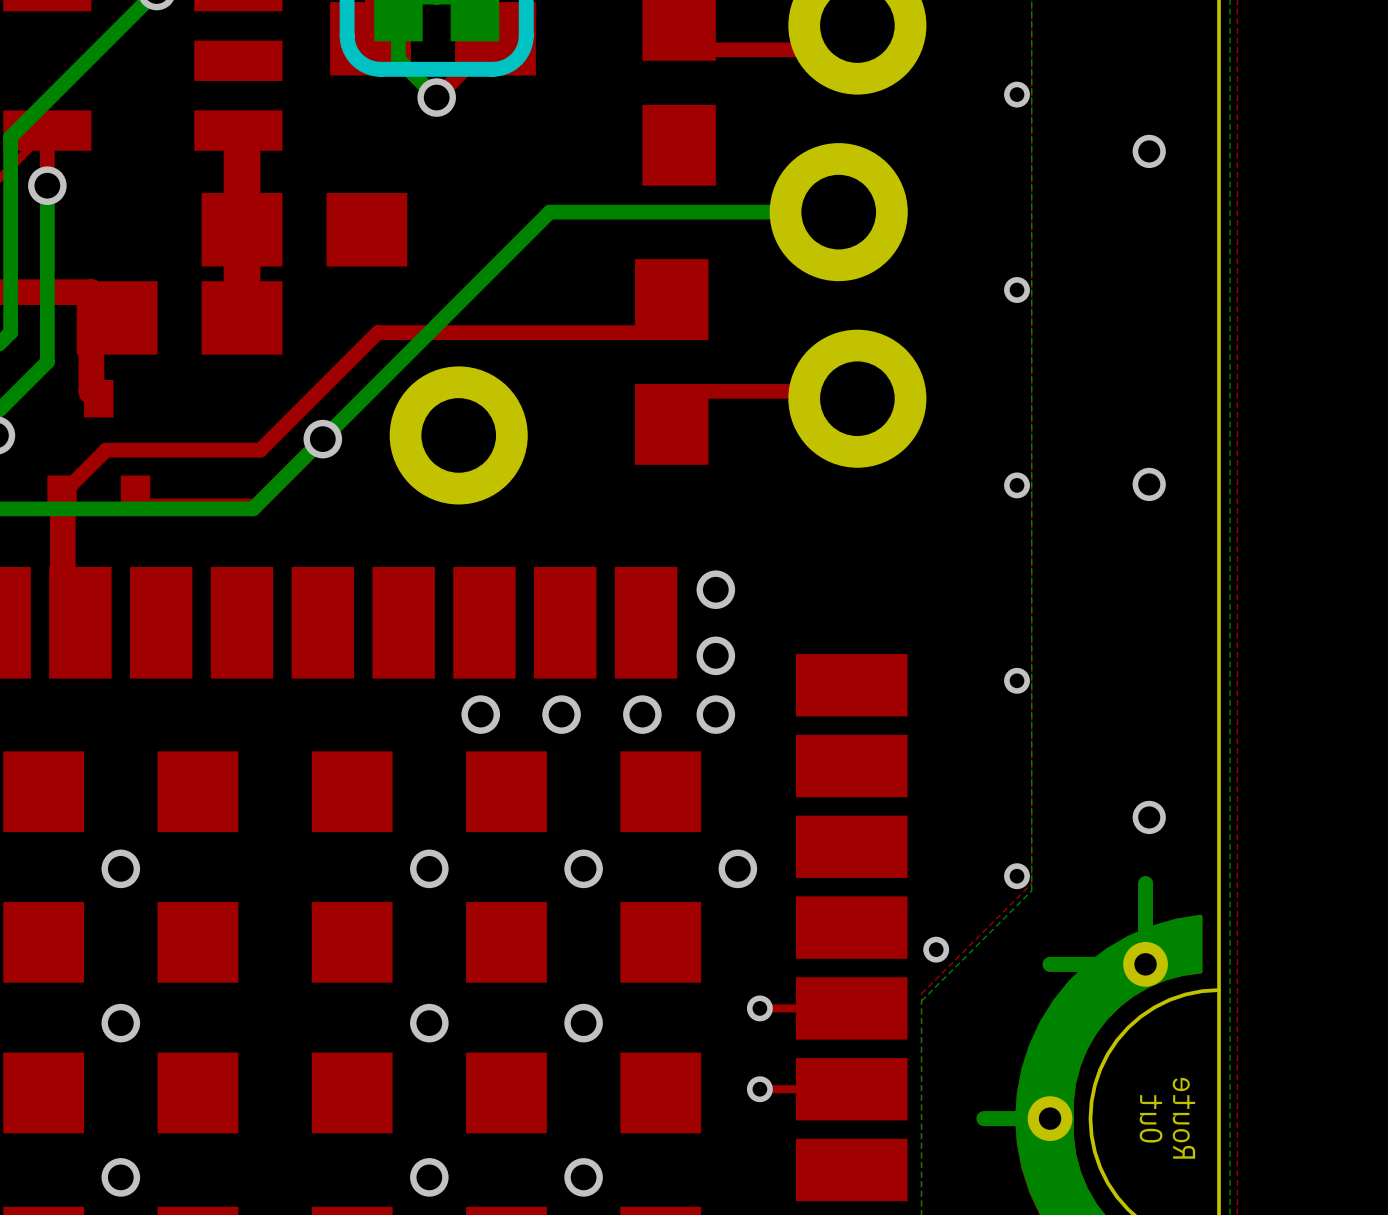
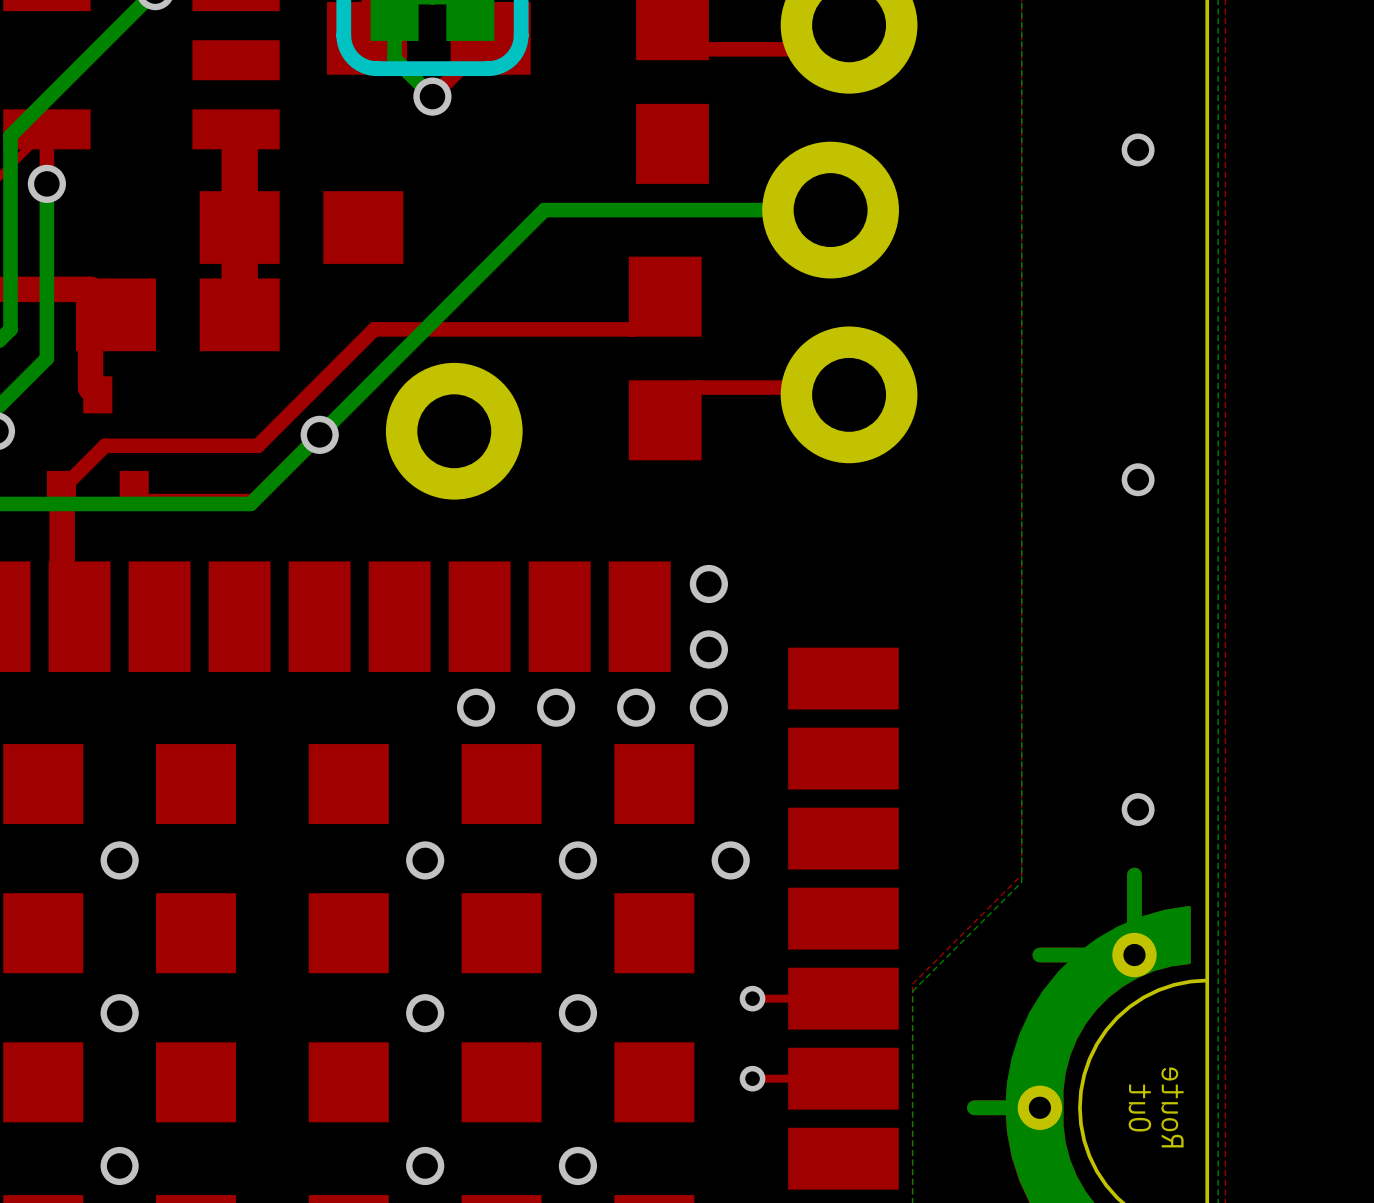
via: (1017, 94) -> none
via: (1017, 290) -> none
via: (1017, 485) -> none
via: (1017, 680) -> none
via: (1017, 876) -> none
via: (936, 949) -> none

